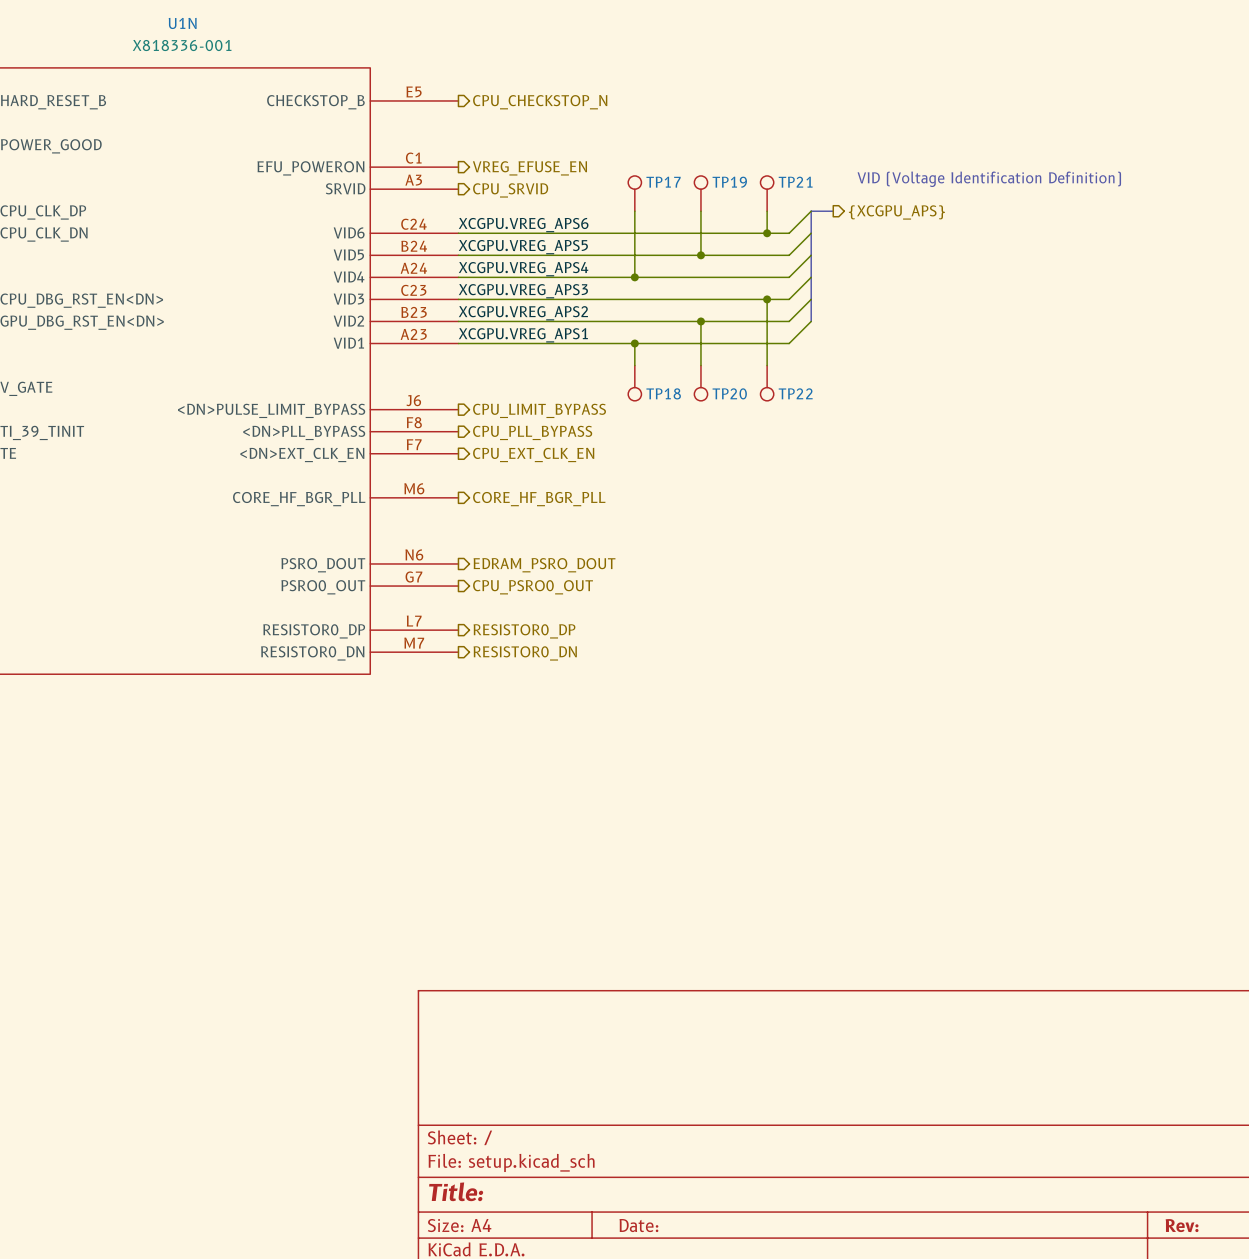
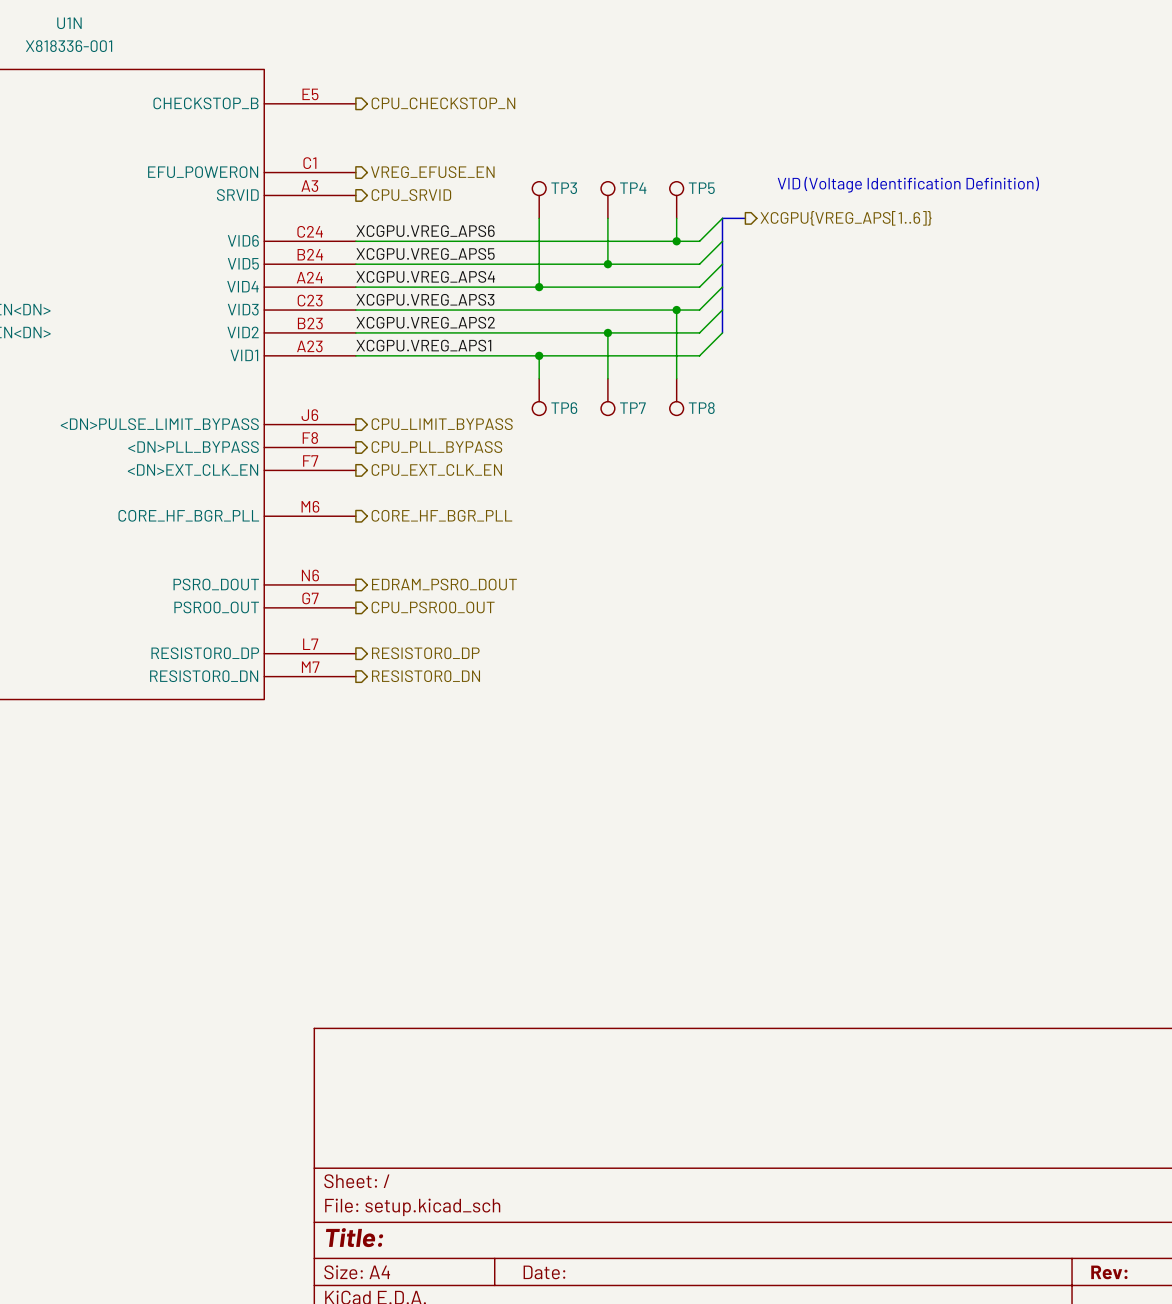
TP17 name: TP17 (663, 182) -> TP3 (564, 188)
TP19 name: TP19 (729, 182) -> TP4 (633, 188)
TP21 name: TP21 (795, 182) -> TP5 (701, 188)
hierarchical label: {XCGPU_APS} (896, 212) -> XCGPU{VREG_APS[1..6]} (846, 218)
TP18 name: TP18 (663, 393) -> TP6 (564, 408)
TP20 name: TP20 (729, 393) -> TP7 (632, 408)
TP22 name: TP22 (795, 393) -> TP8 (701, 408)

